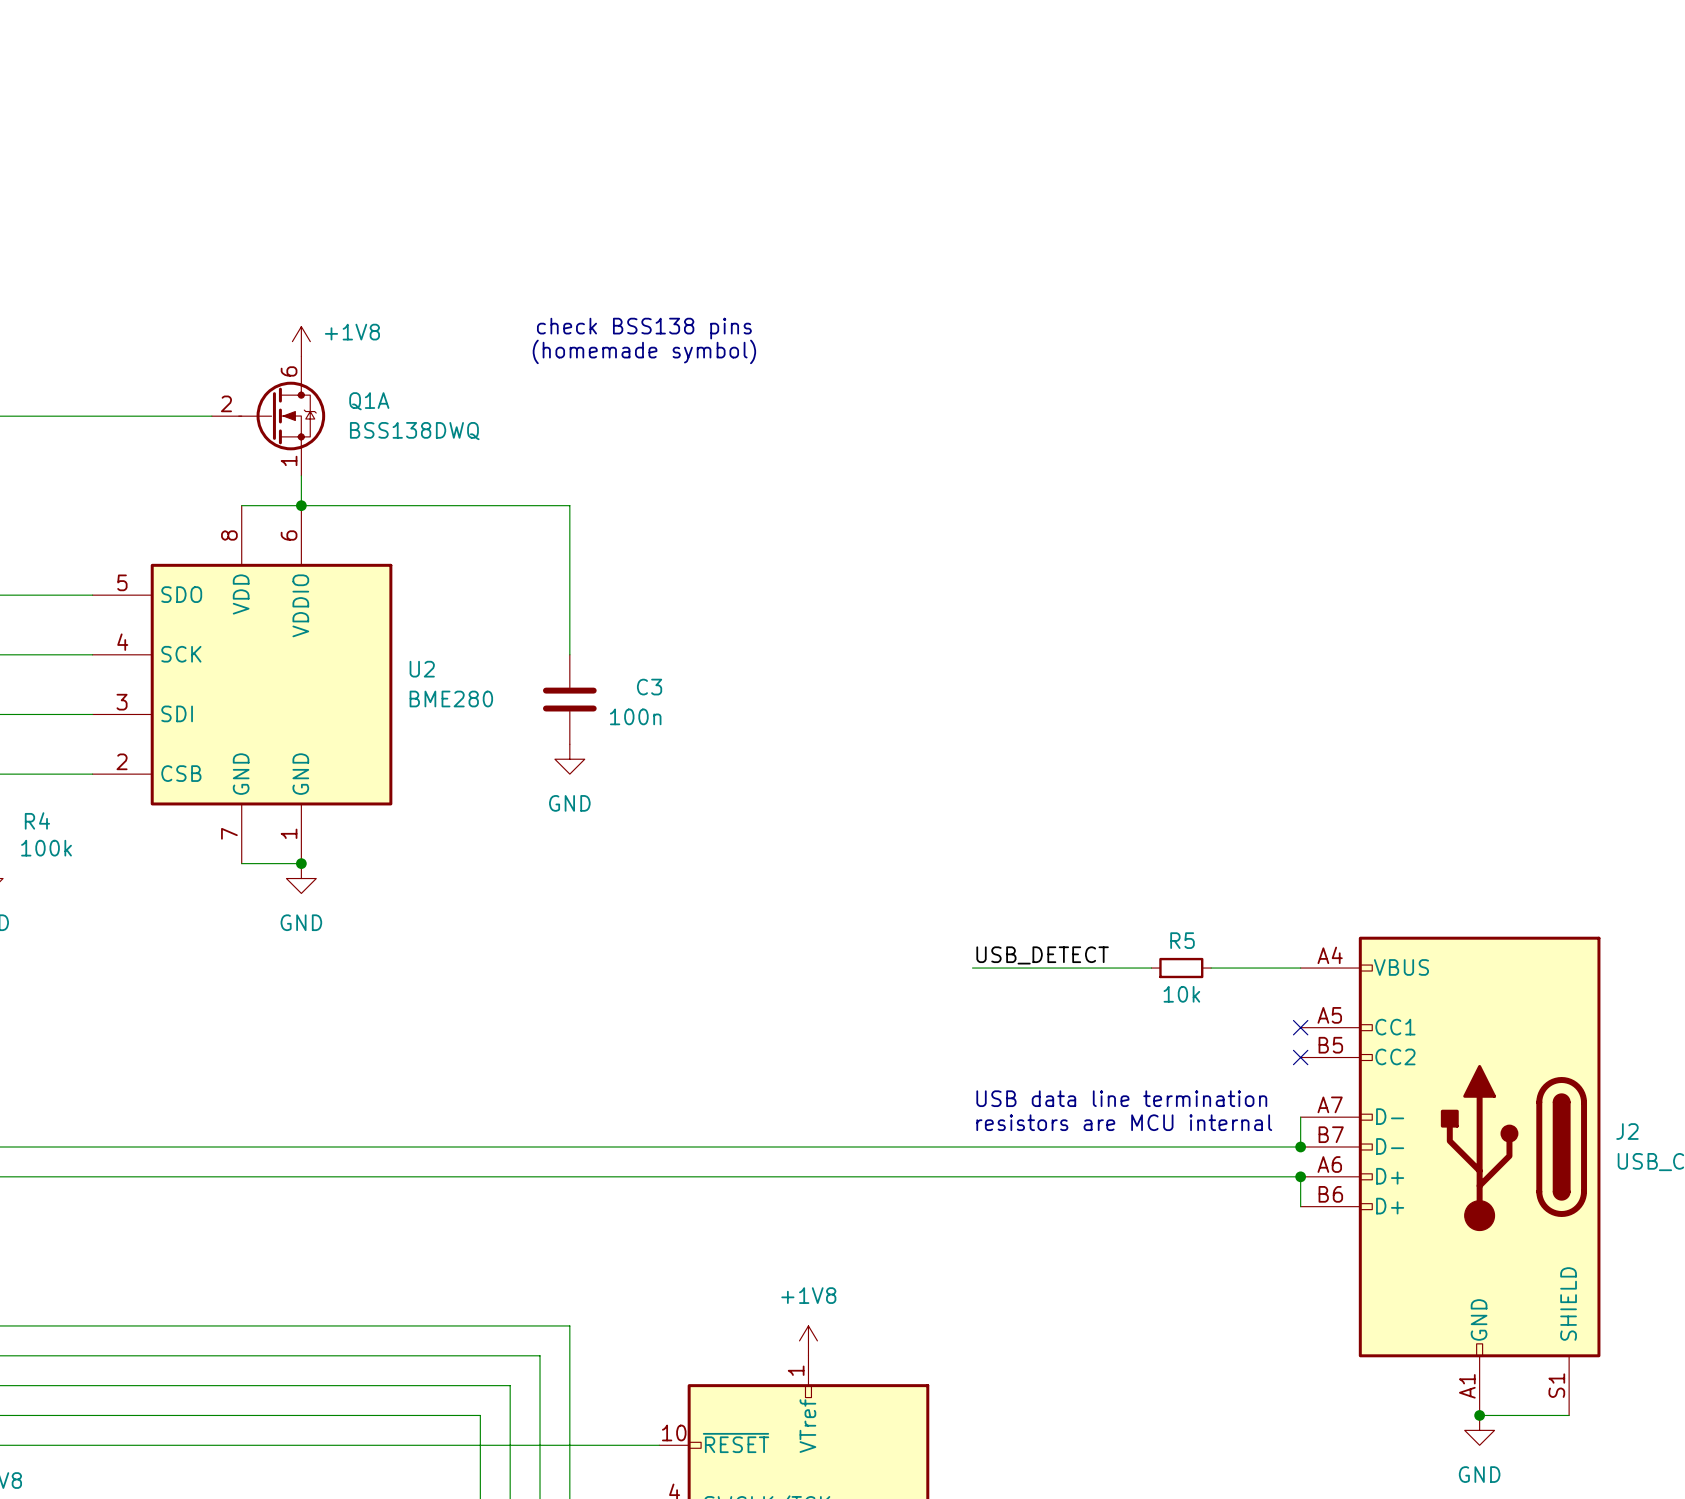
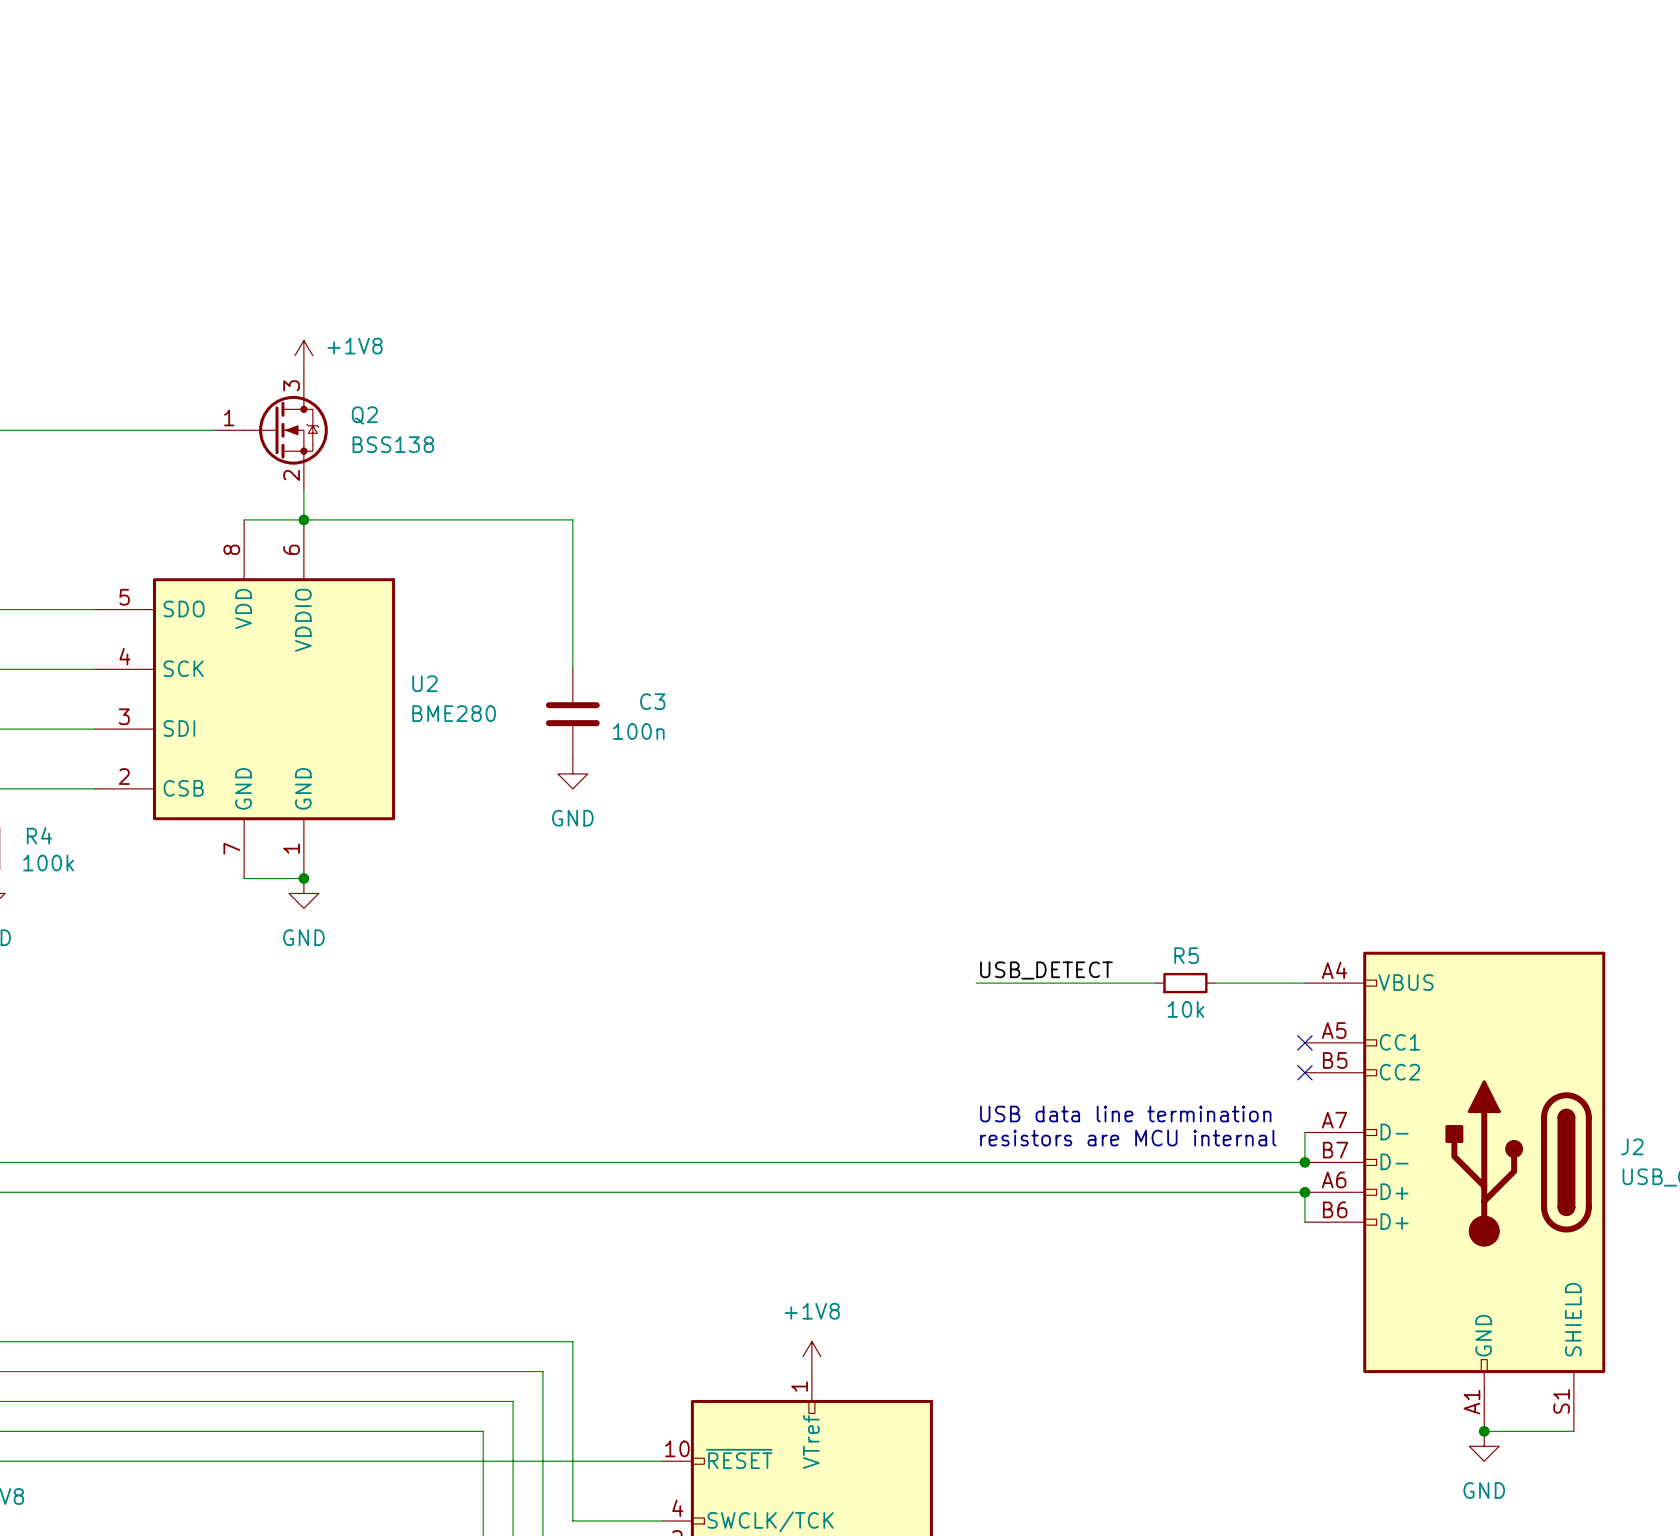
text: check BSS138 pins (644, 328) -> none
text: (homemade symbol) (644, 351) -> none
Q1A: BSS138DWQ (268, 416) -> none
Q2: none -> BSS138 (271, 430)

